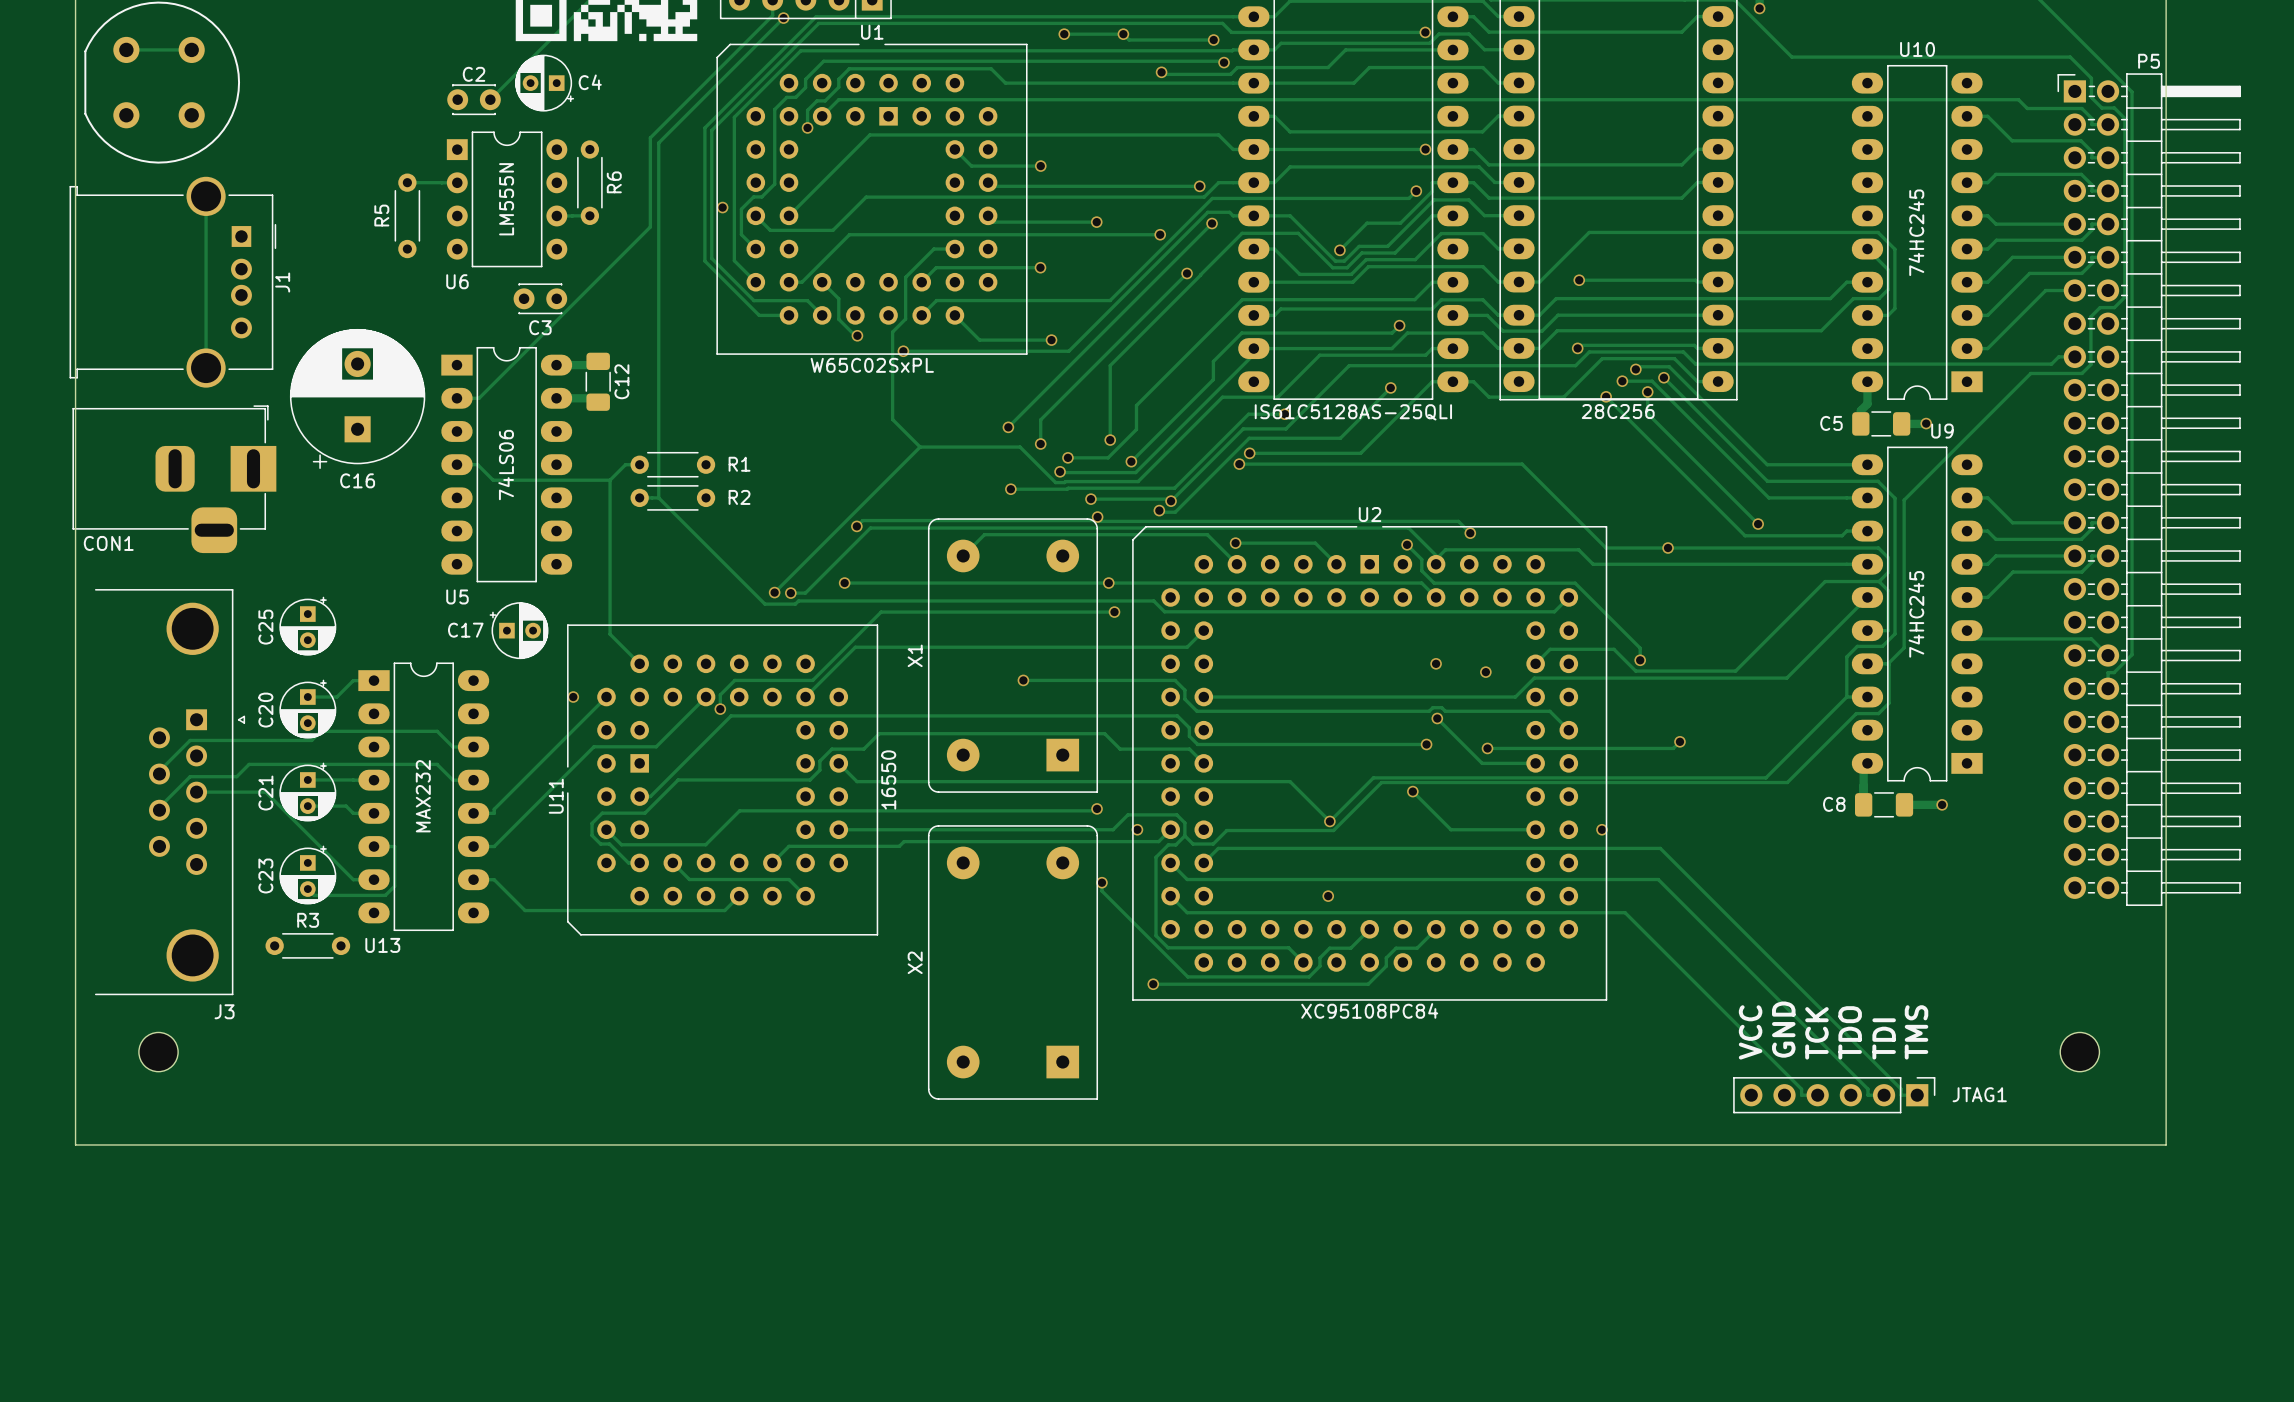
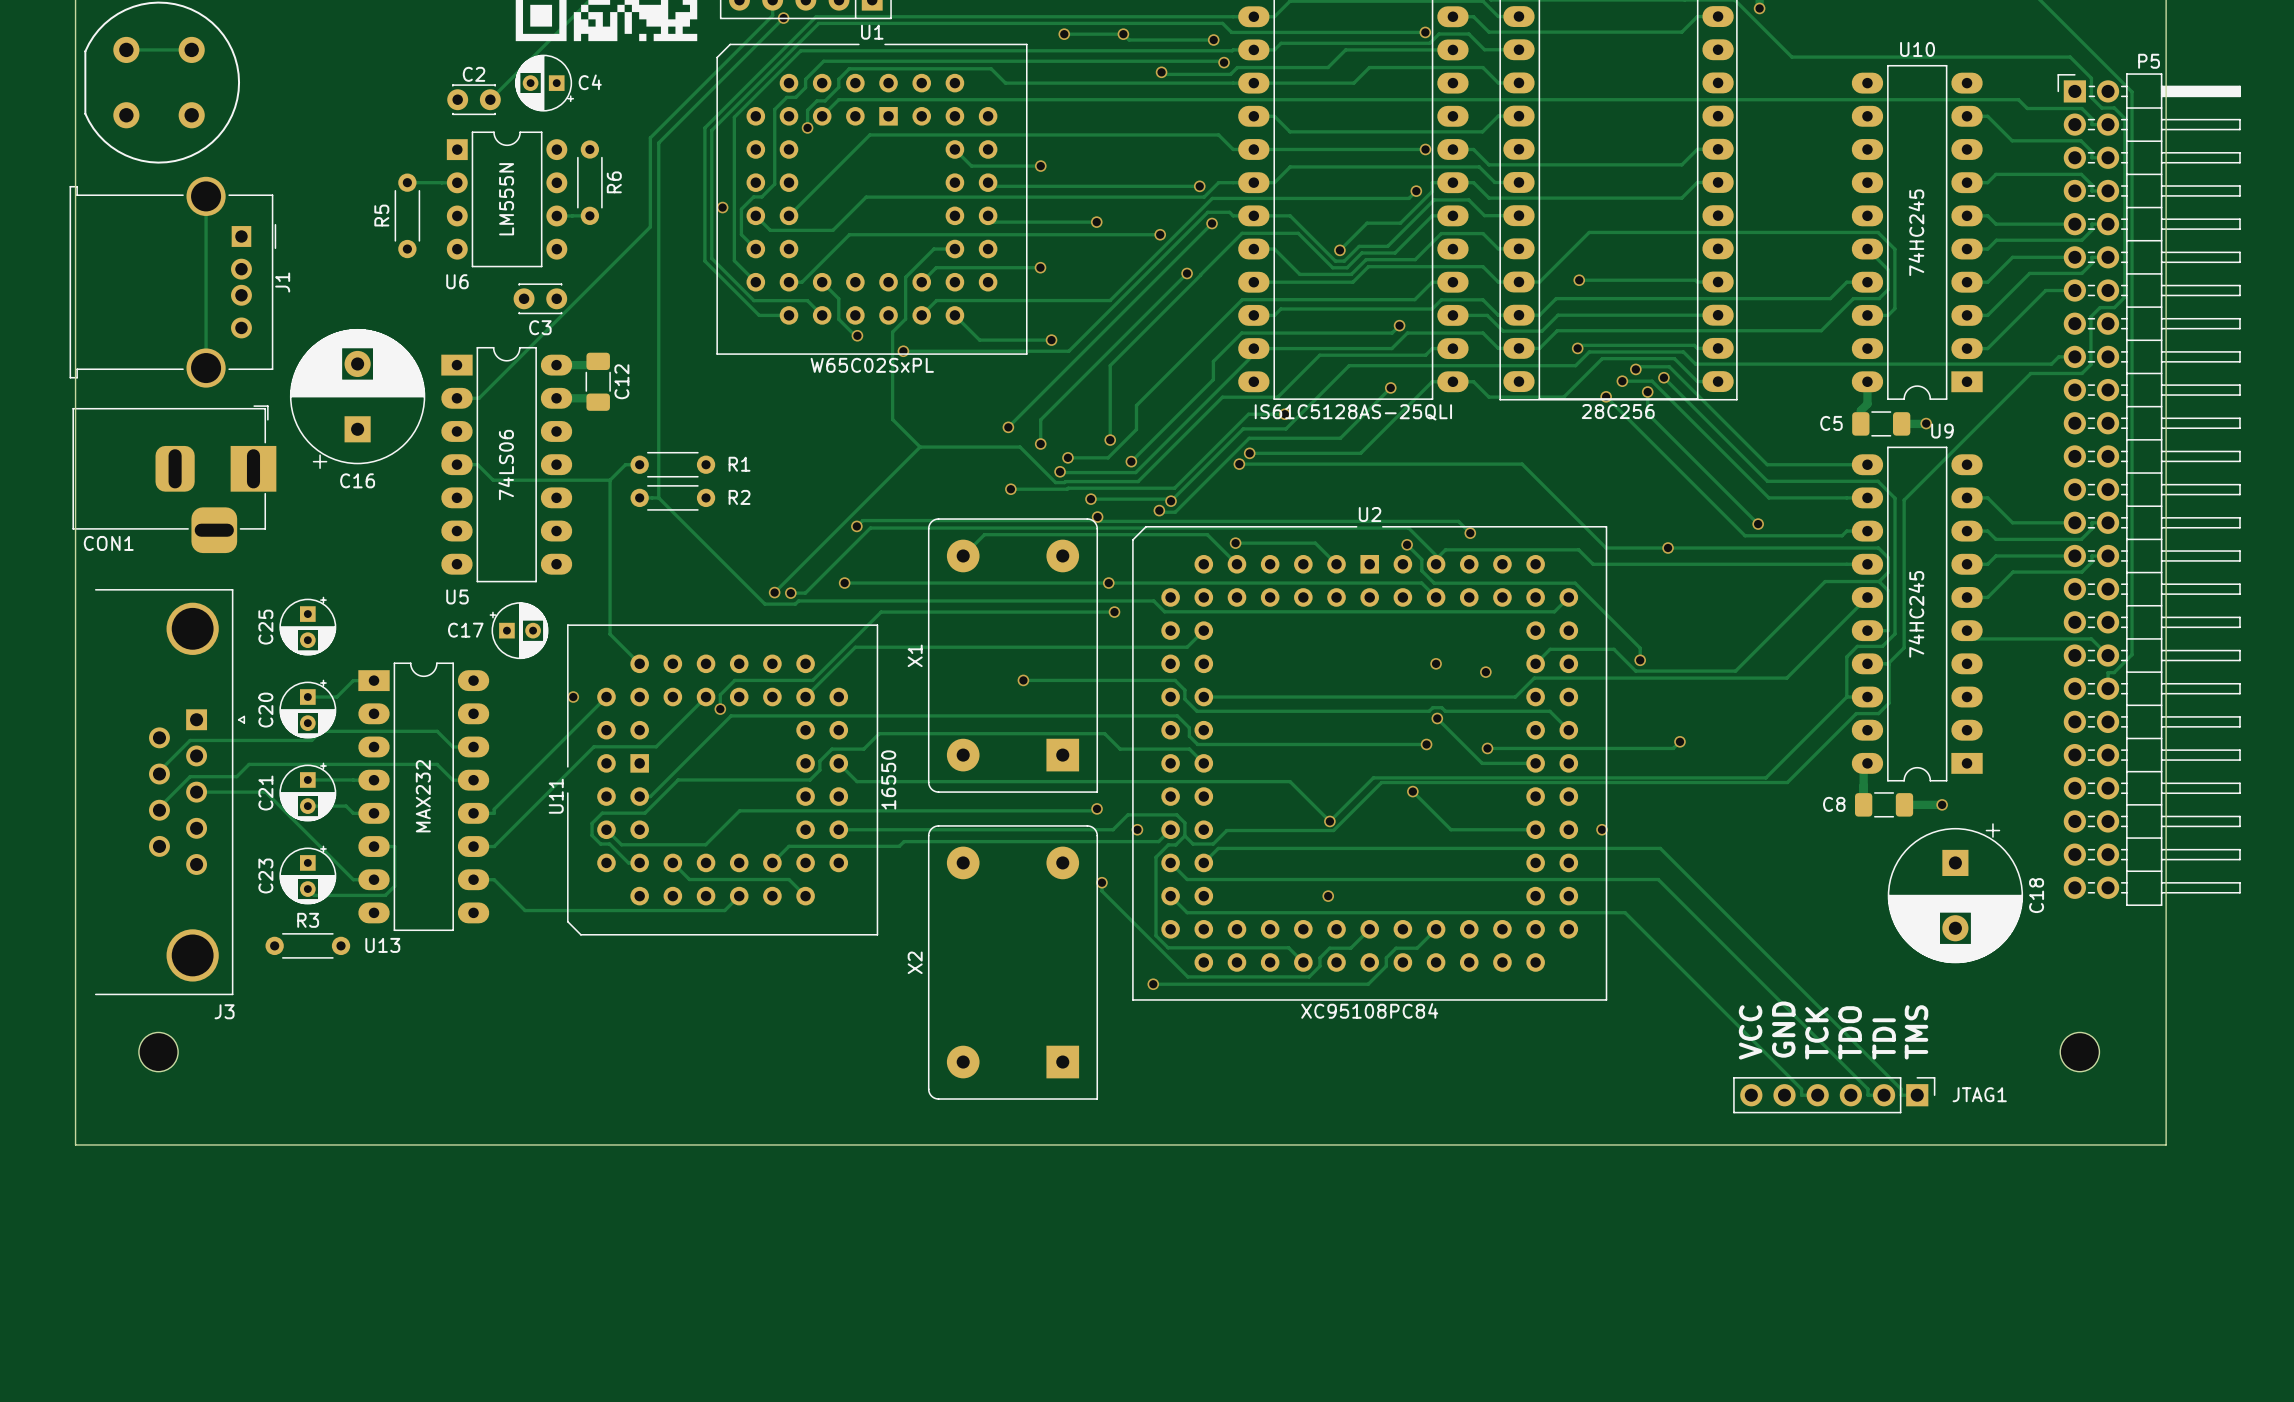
C18: none -> (1955, 893)

